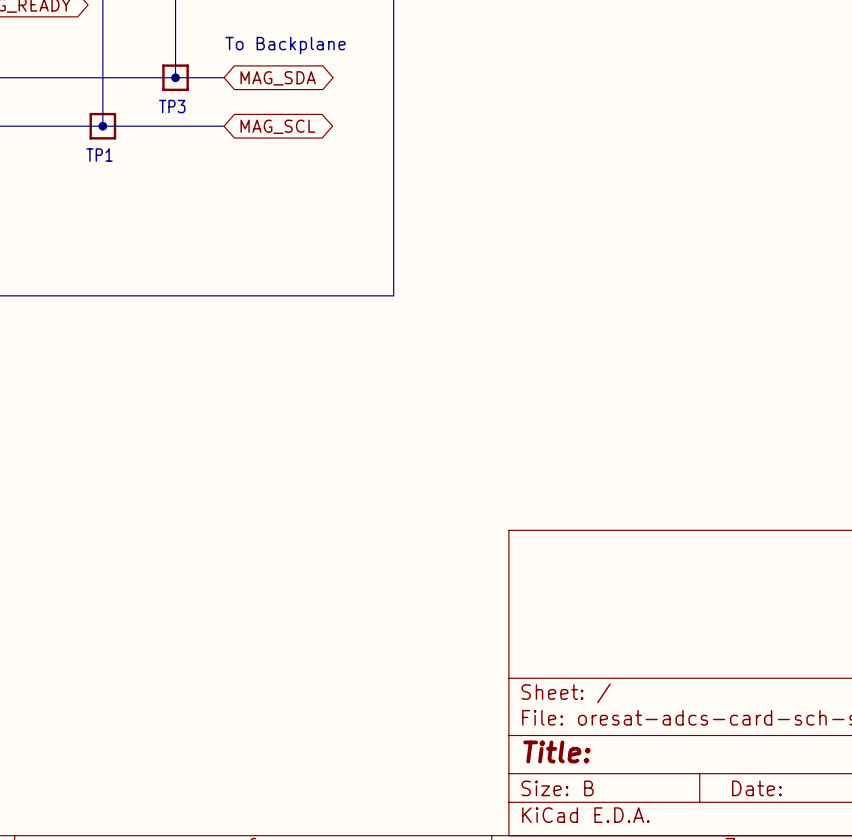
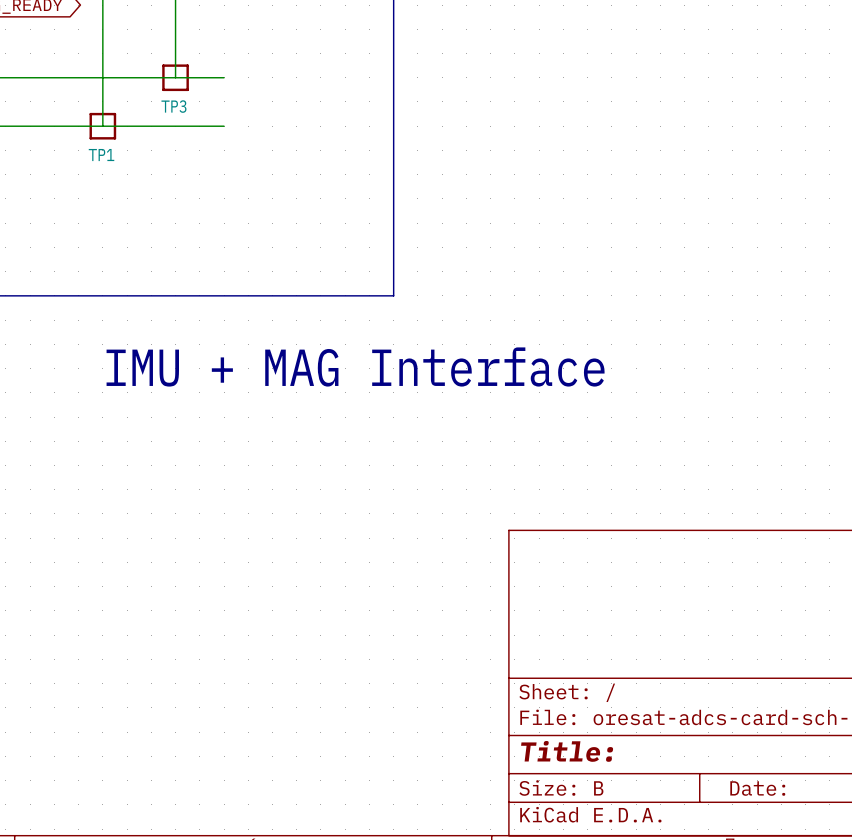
text: To Backplane (285, 45) -> none
junction: (175, 77) -> none
global label: MAG_SDA (278, 78) -> none
junction: (102, 126) -> none
global label: MAG_SCL (277, 126) -> none
text: none -> IMU + MAG Interface (355, 366)

